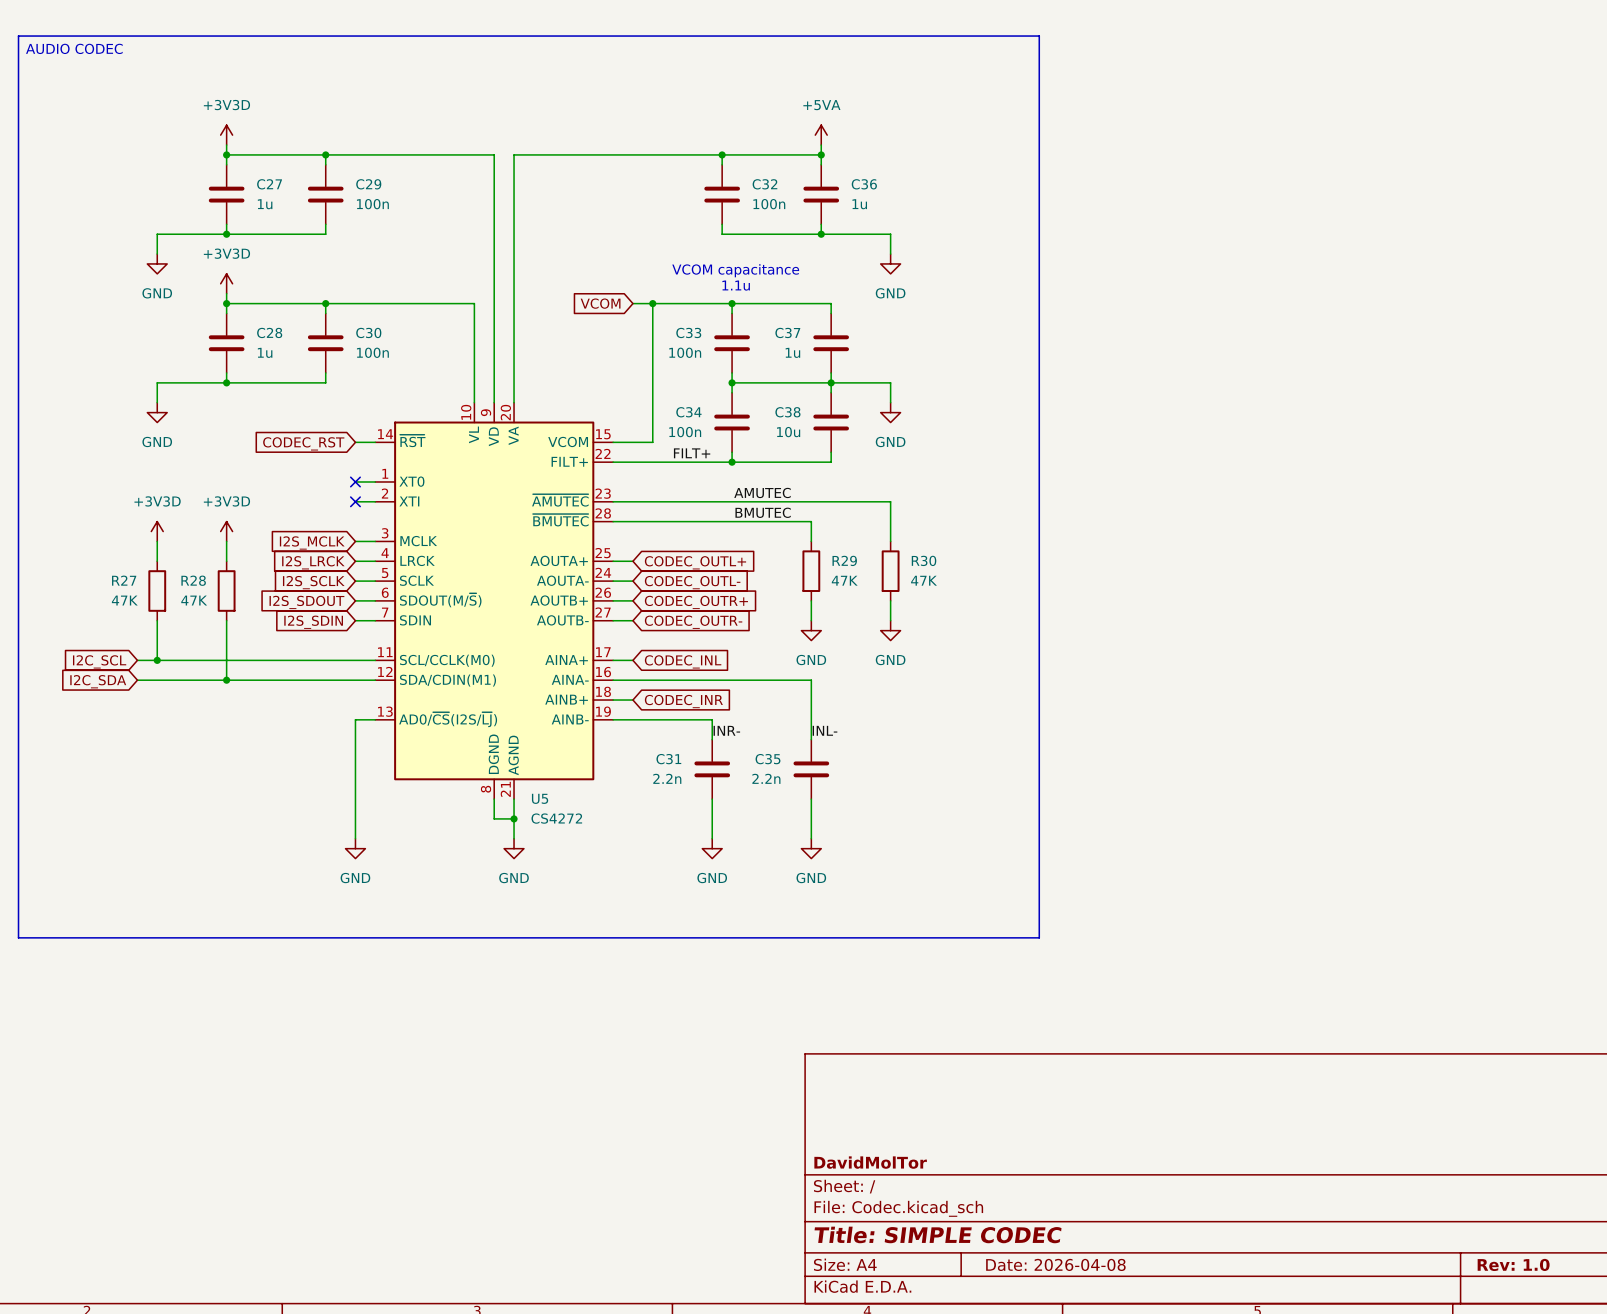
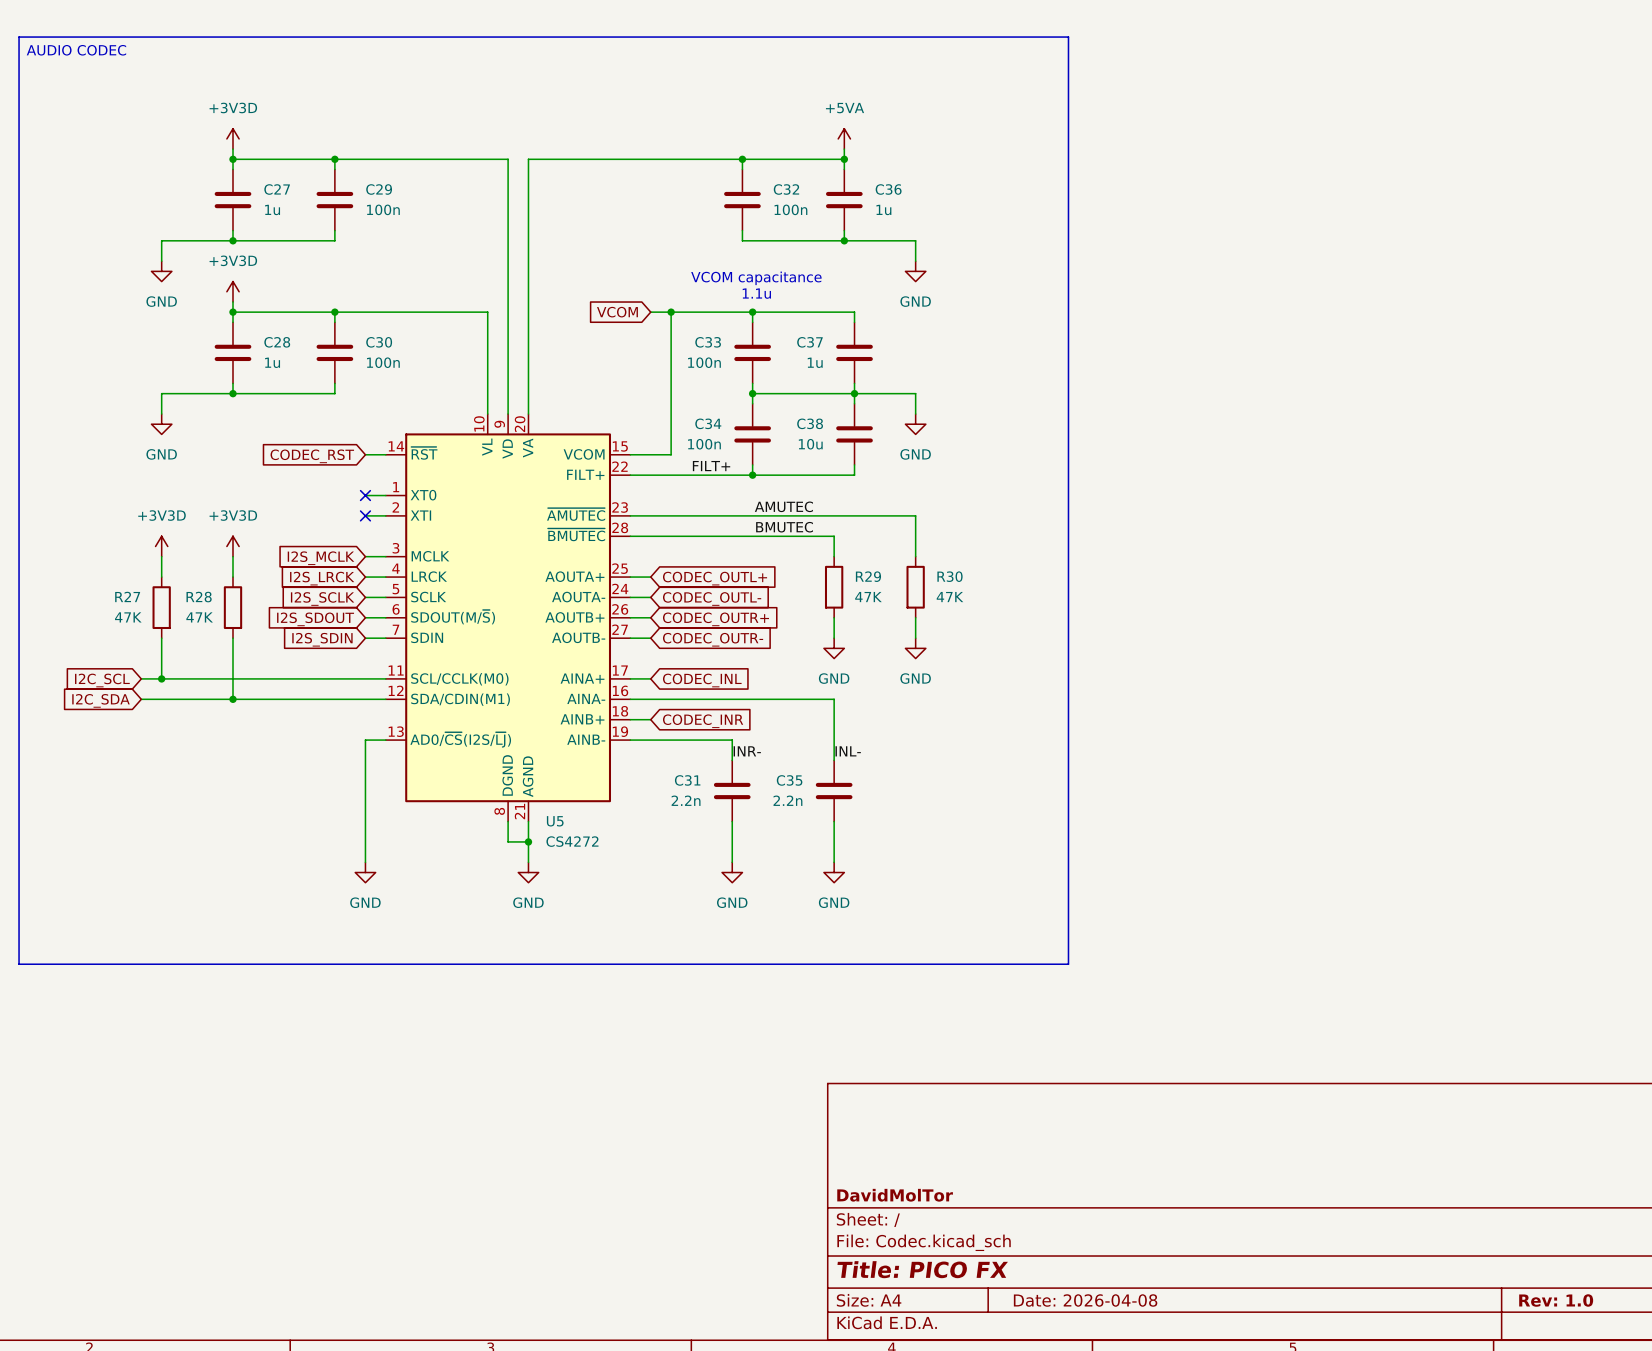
title block: Title: SIMPLE CODEC (938, 1234) -> Title: PICO FX (922, 1269)

